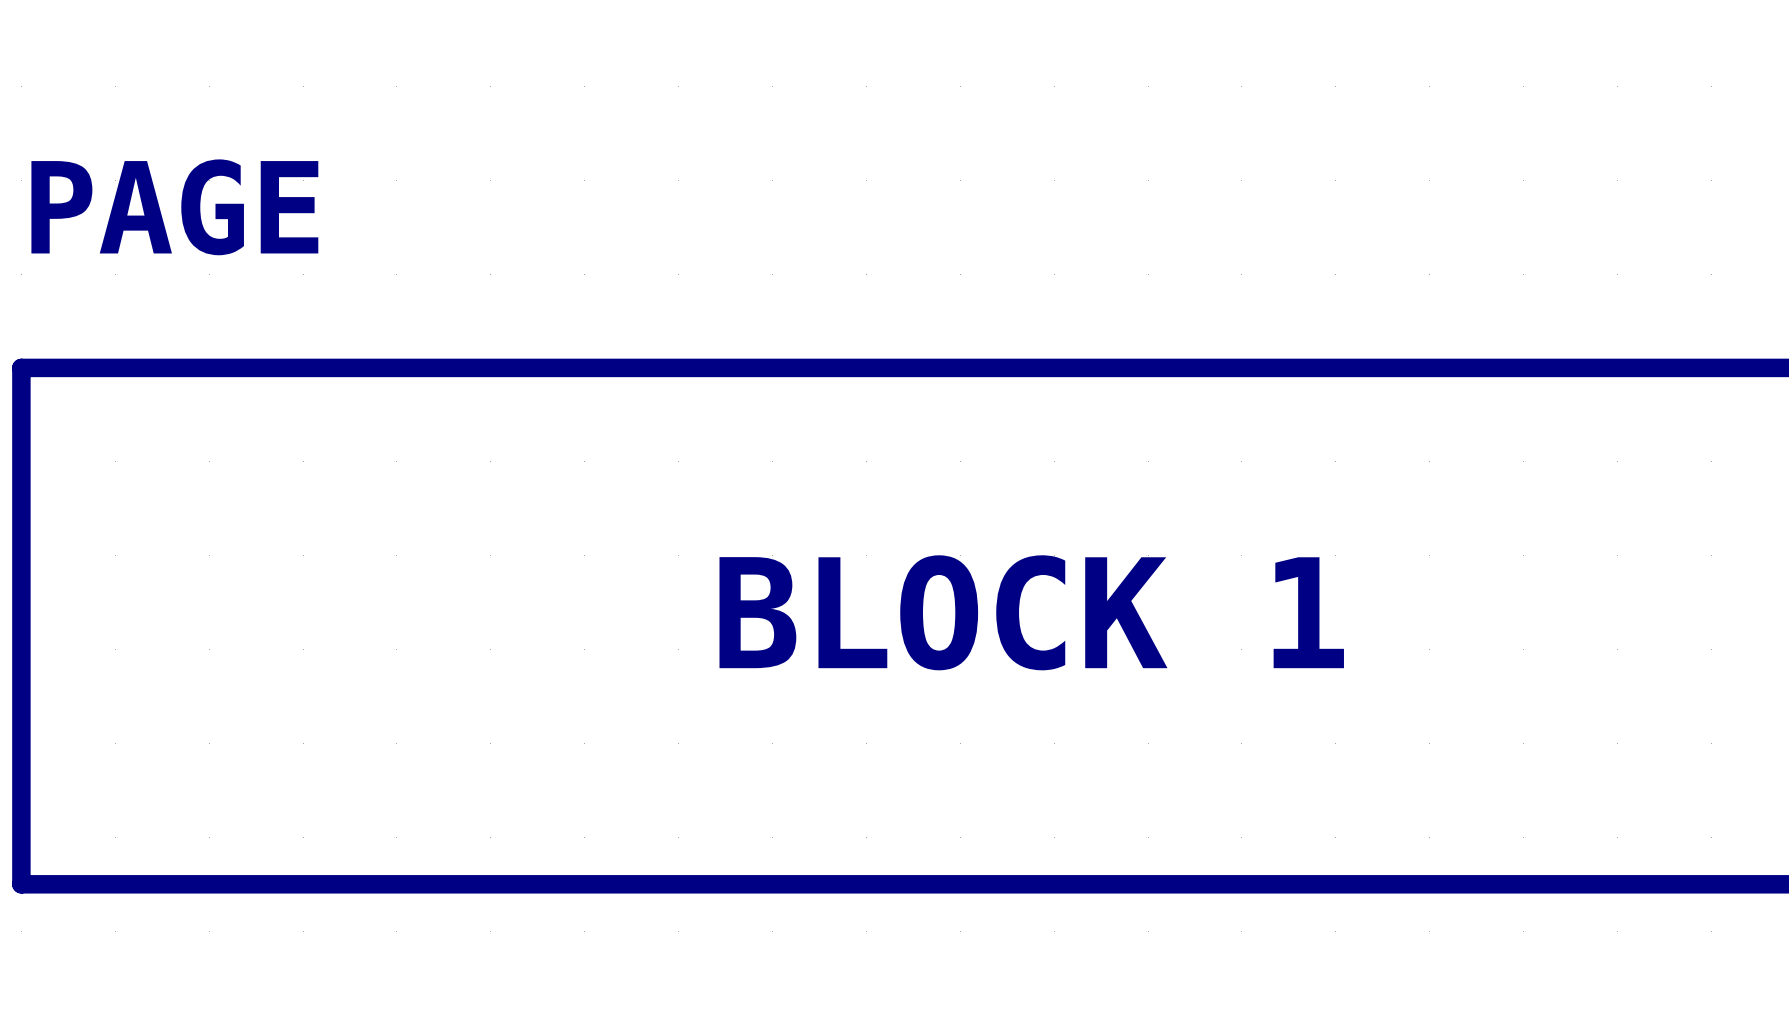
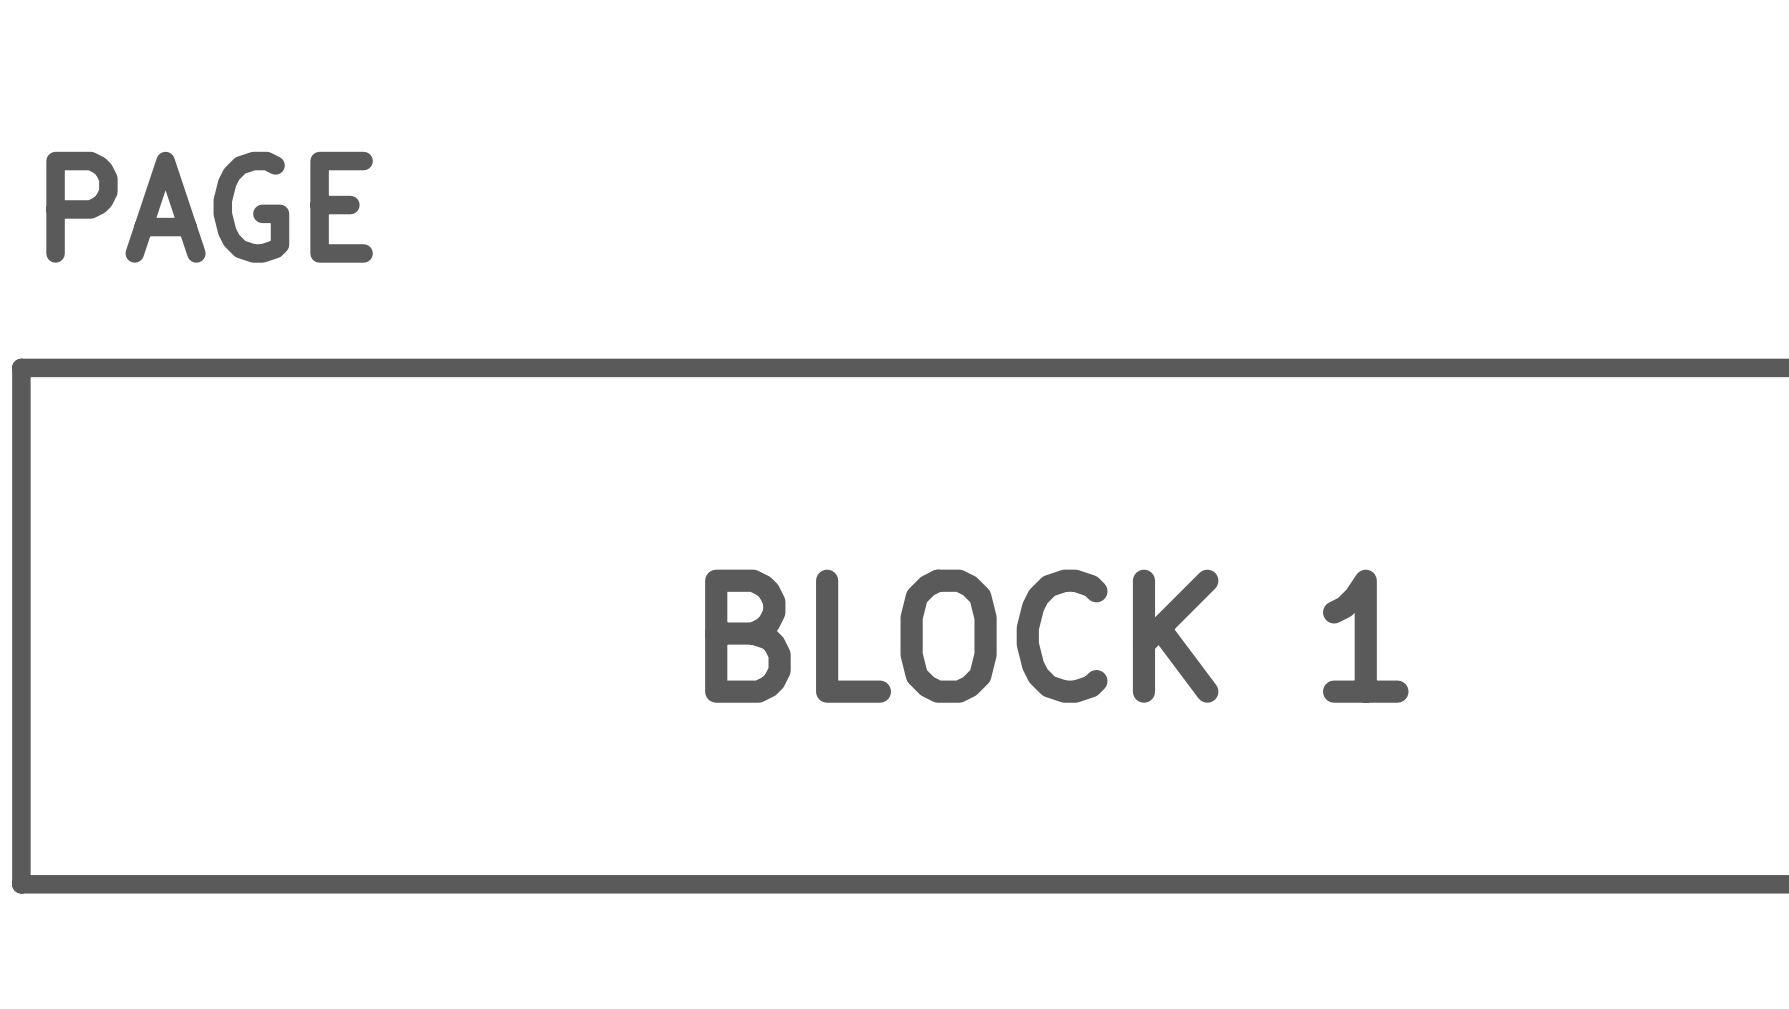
text position: BLOCK 1 (1031, 612) -> BLOCK 1 (1056, 636)

